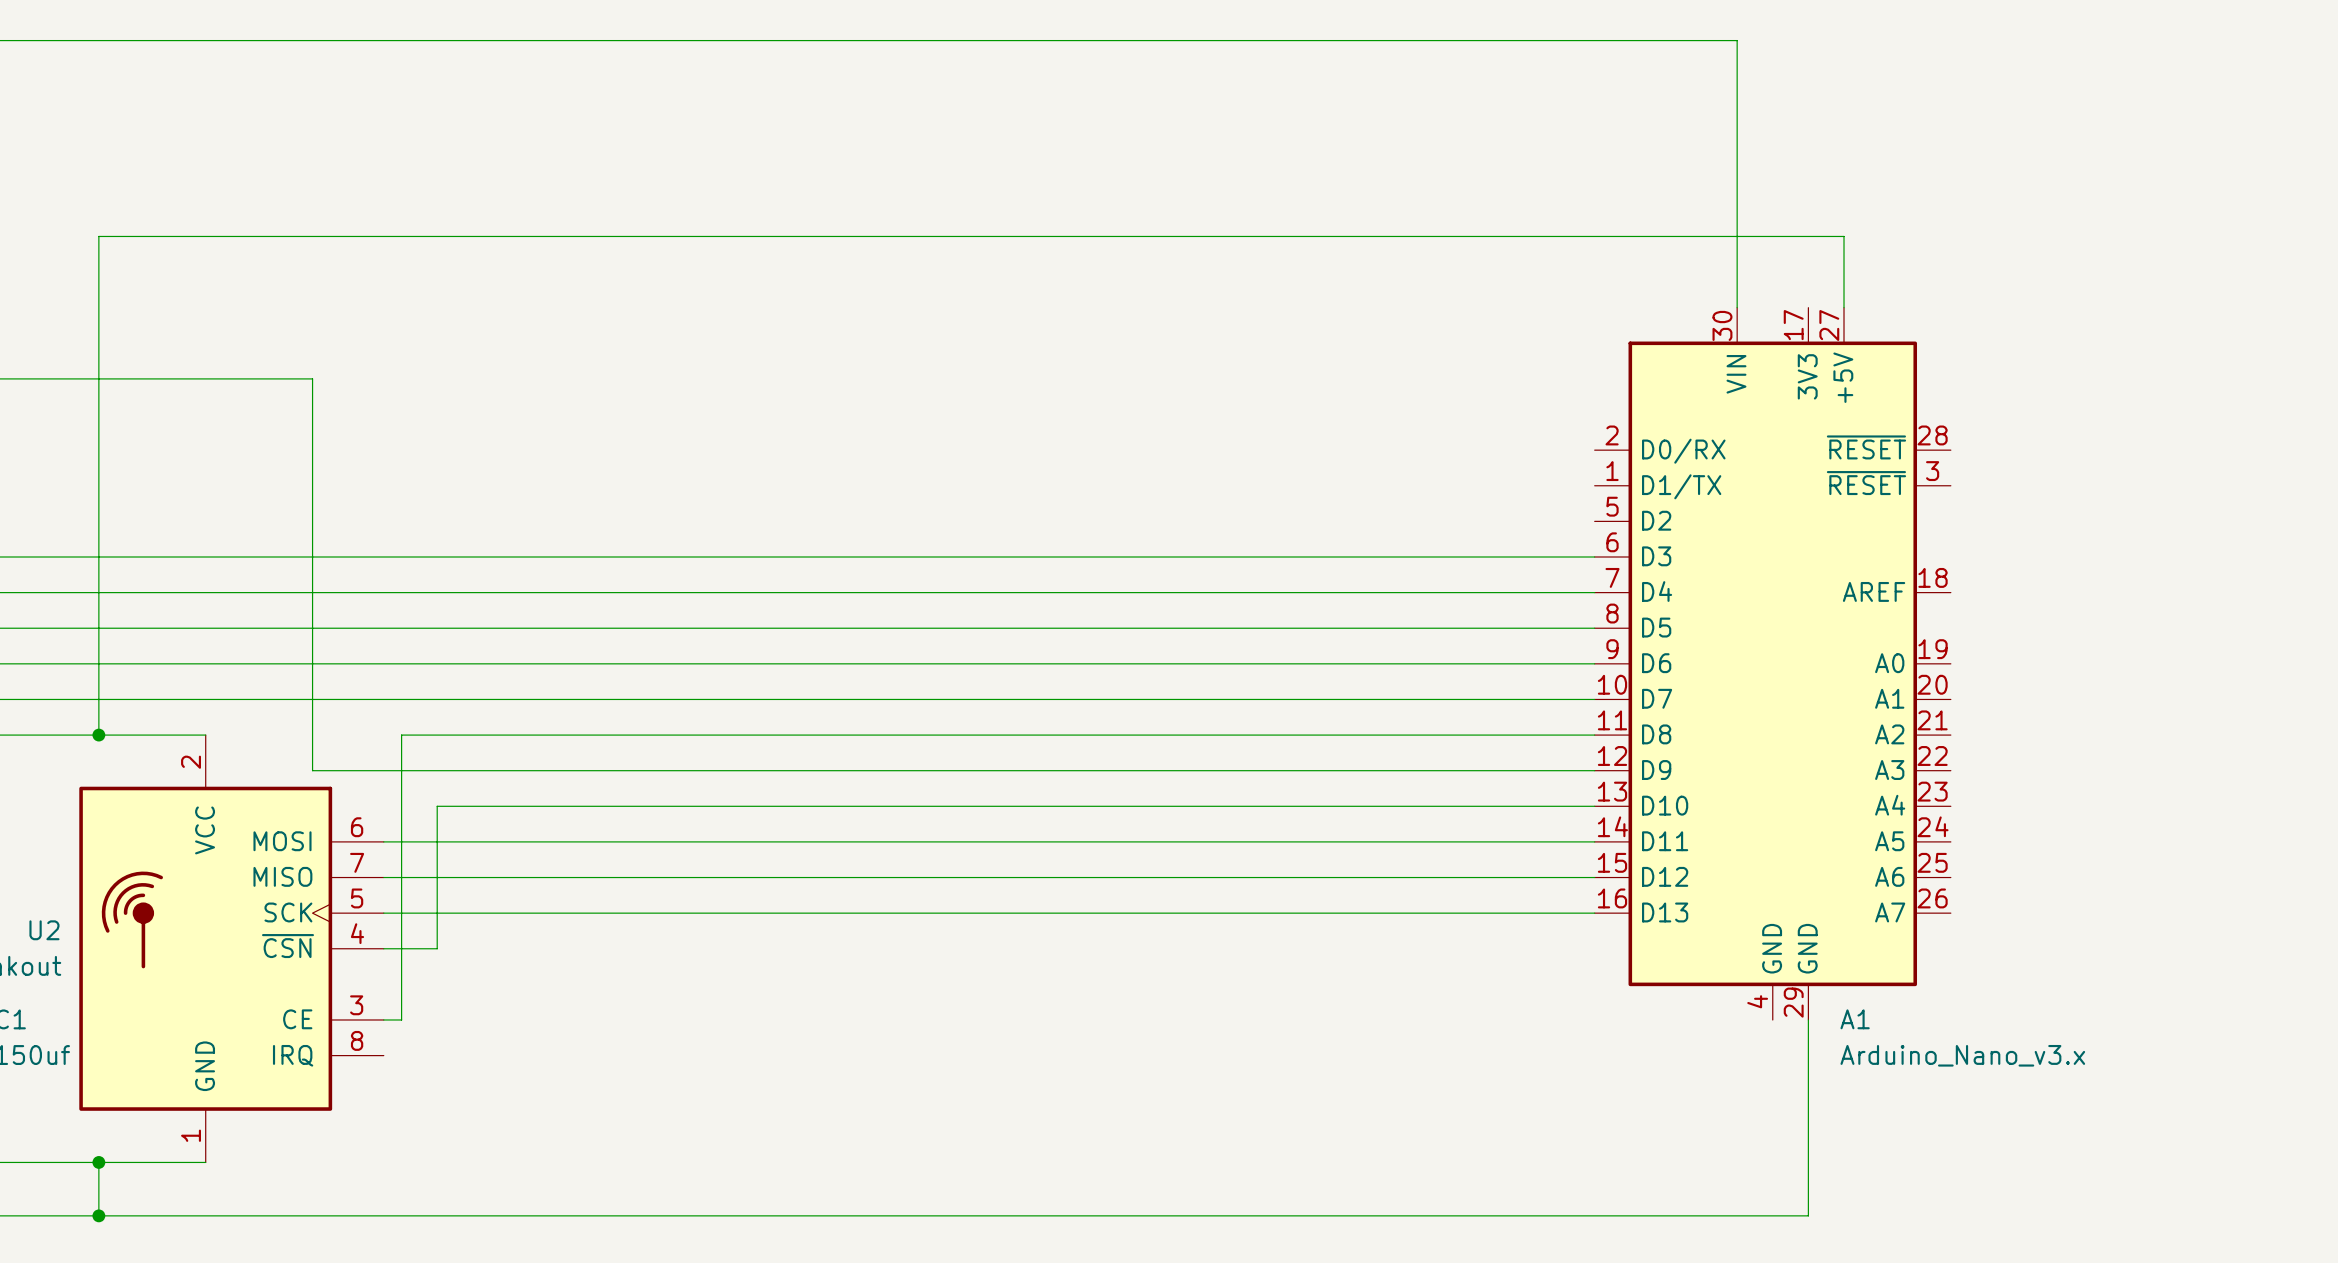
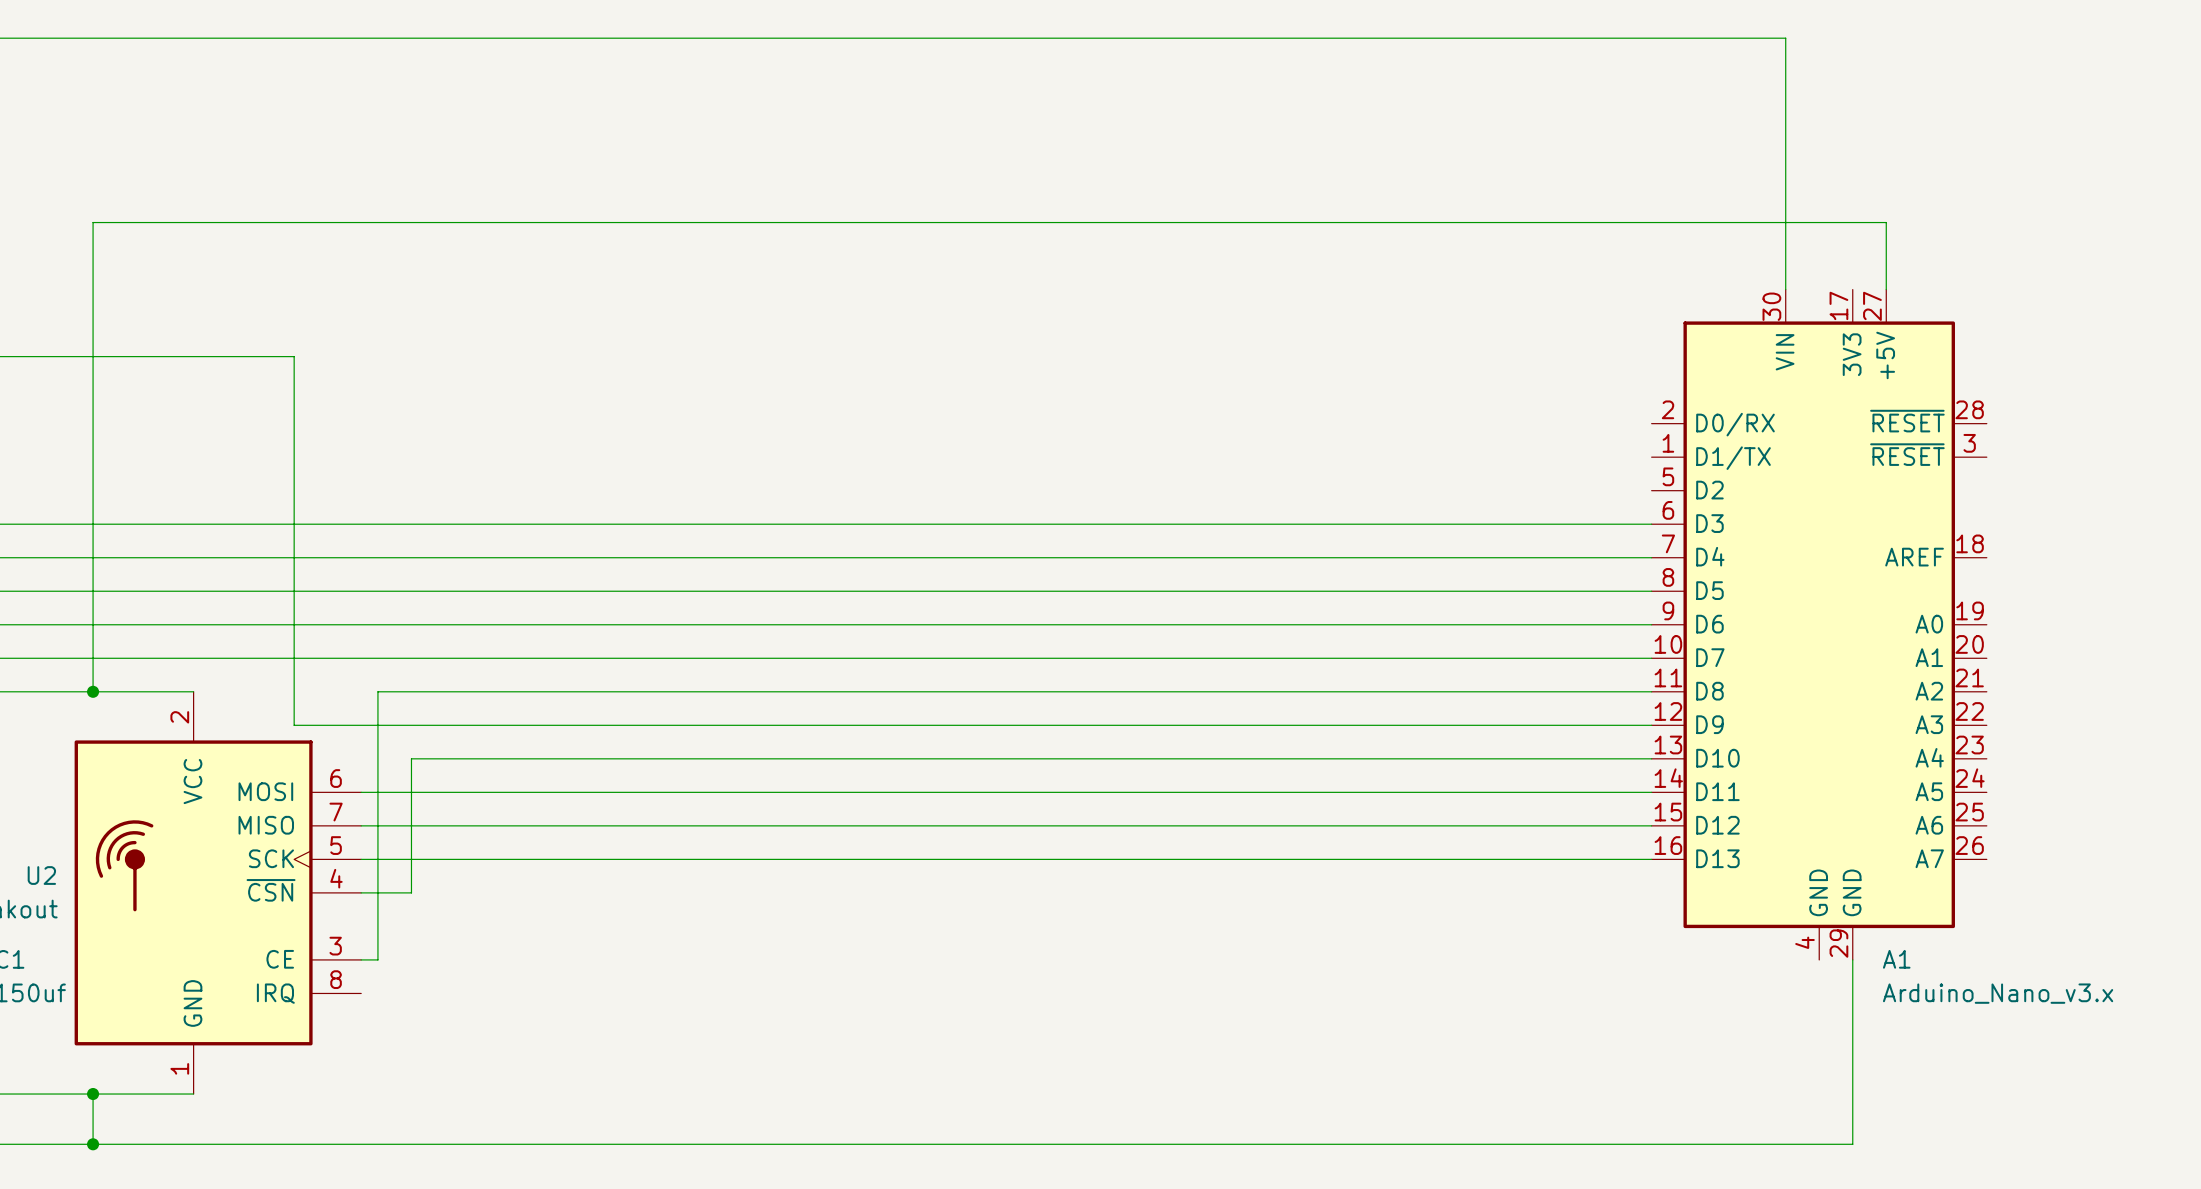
wire: (1737, 40) (1737, 307) -> (1634, 38) (1785, 38) (1785, 289)
wire: (1844, 236) (1844, 307) -> (1735, 222) (1886, 222) (1886, 289)
A1 position: (1772, 663) -> (1819, 624)
wire: (1808, 1019) (1808, 1215) -> (1852, 959) (1852, 1144) (1701, 1144)

